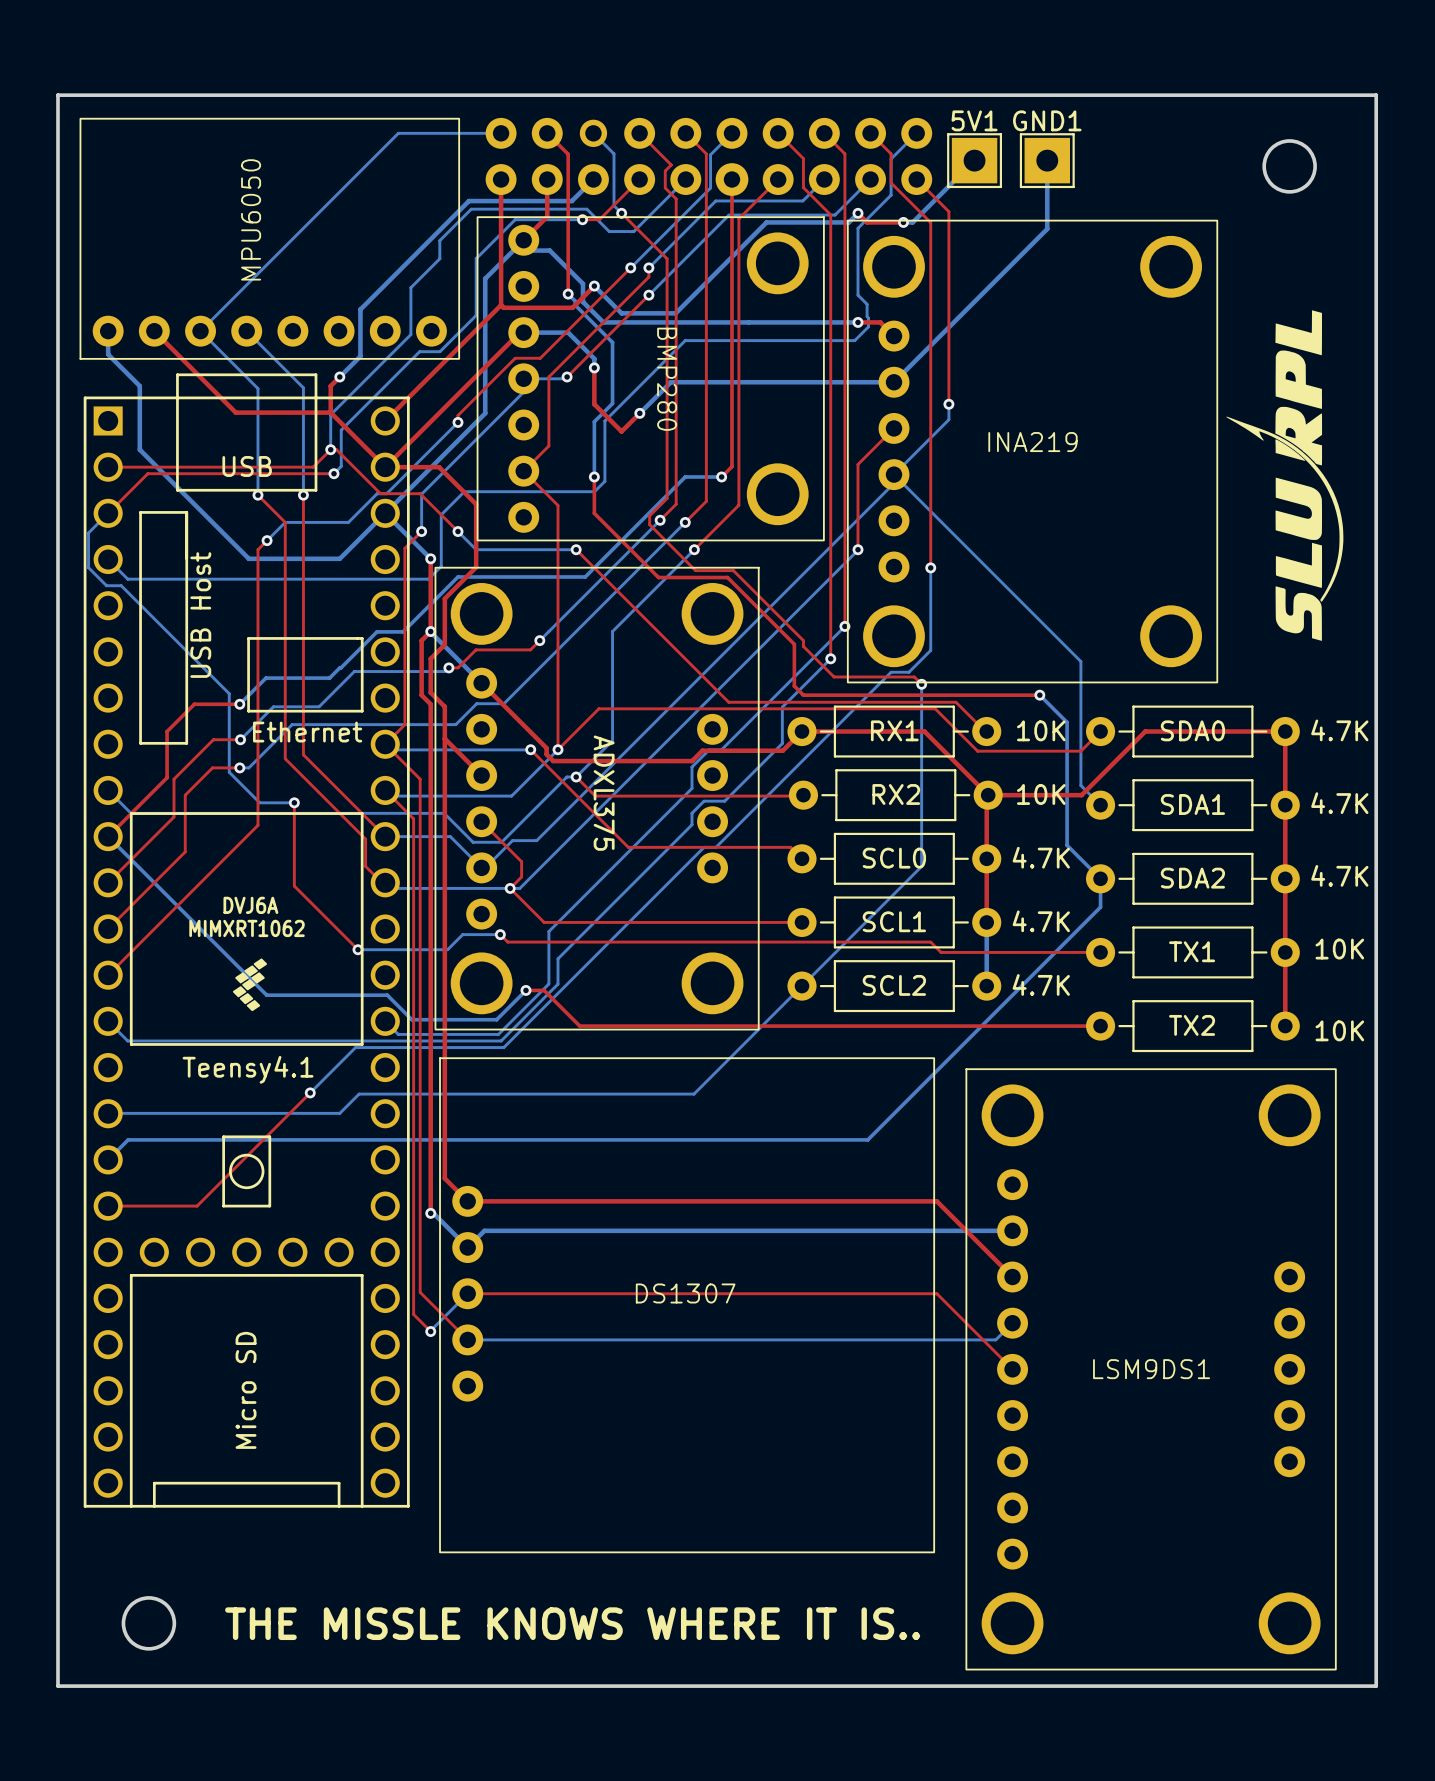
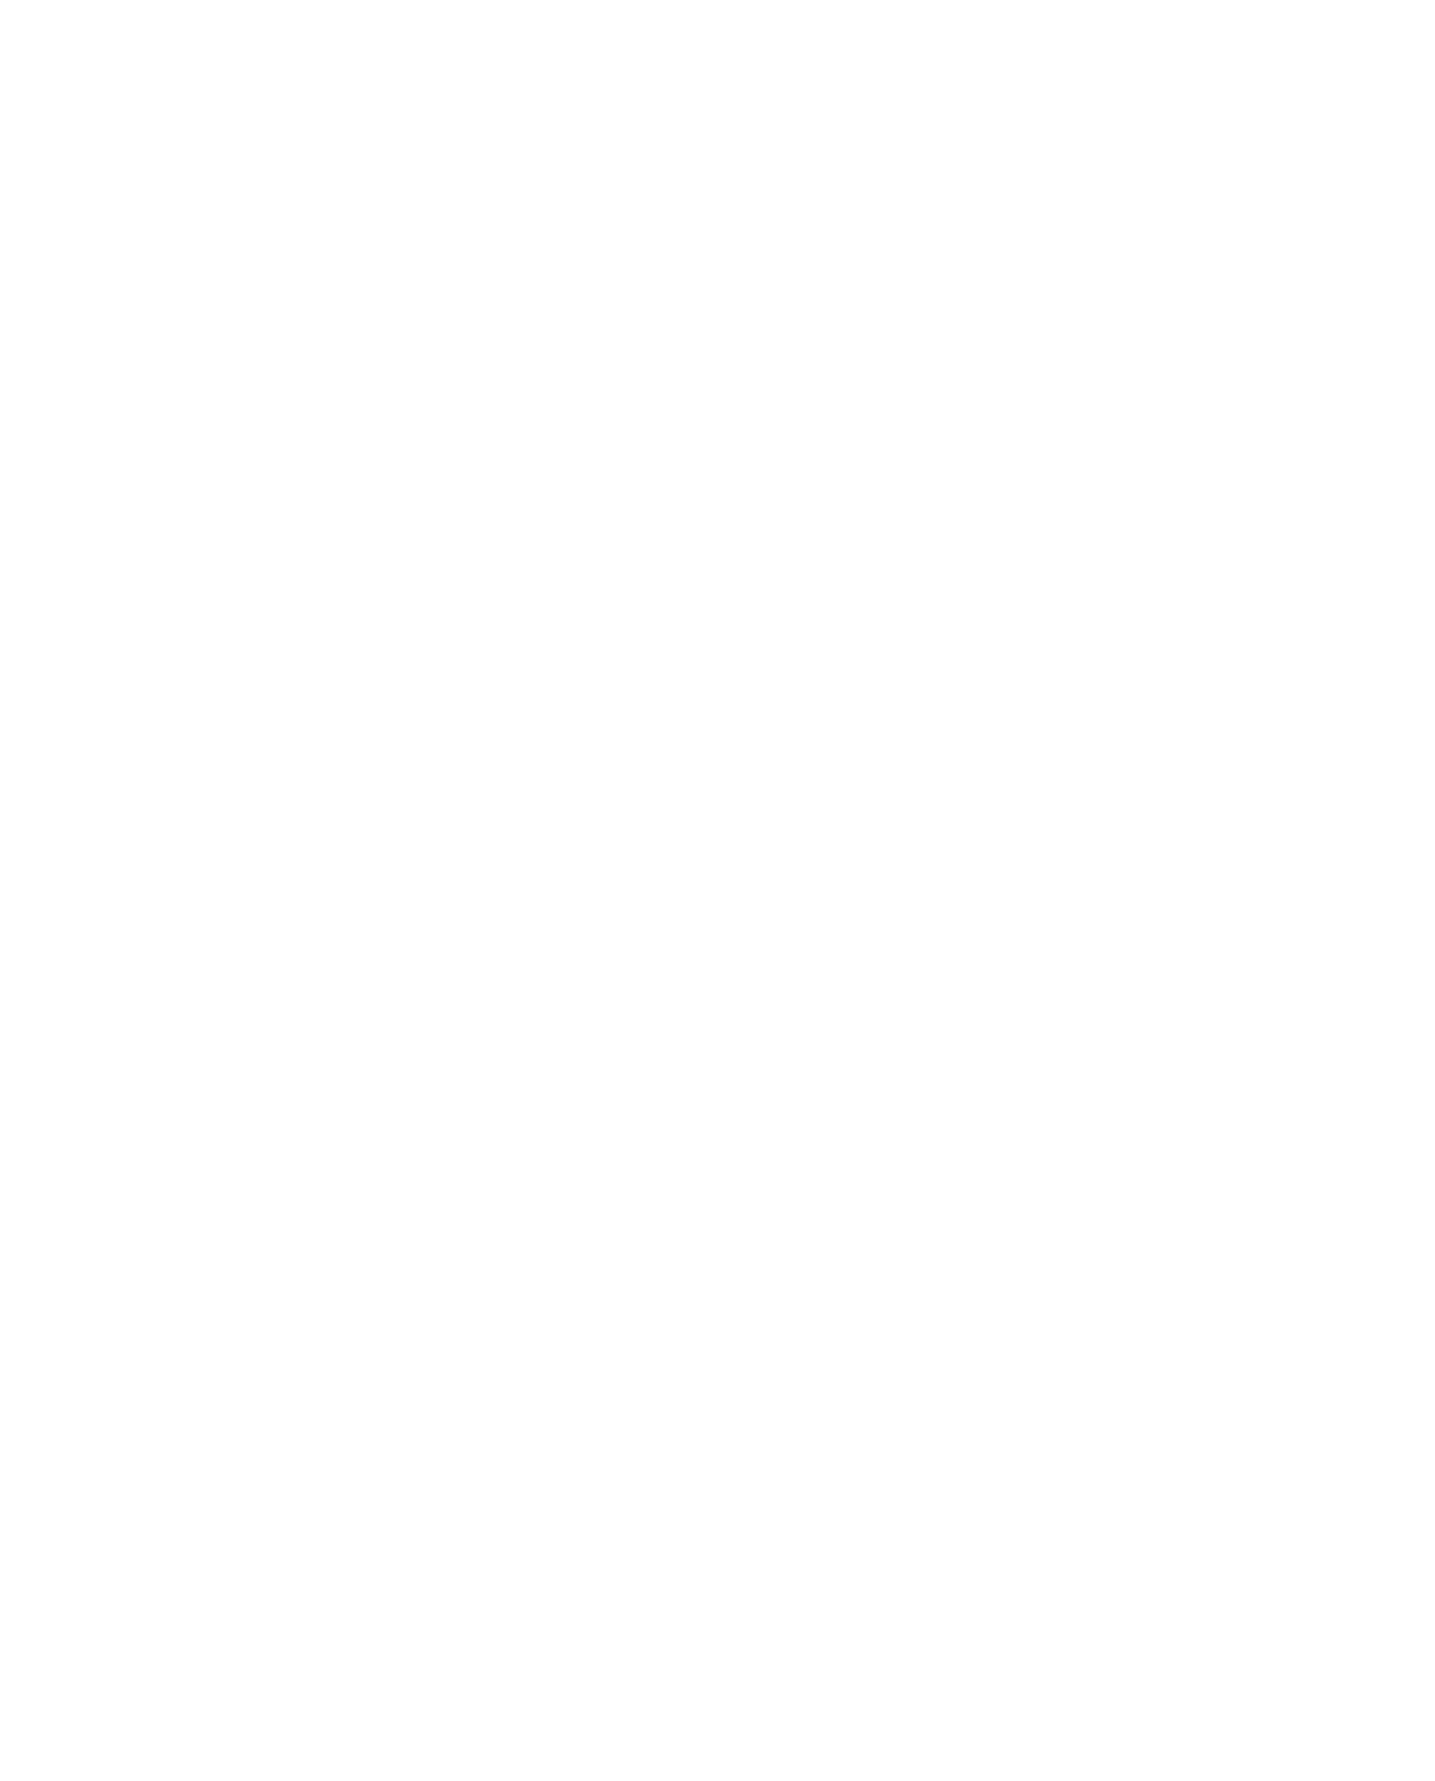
board edge: (57, 95) (1376, 95) (1376, 1686) (57, 1686) (57, 95) -> none
bottom track: (501, 133) (398, 133) (200, 331) (257, 388) (257, 495) -> none
top track: (547, 133) (568, 154) (568, 294) -> none
bottom track: (593, 133) (614, 153) (614, 205) (621, 213) -> none
top track: (639, 133) (671, 165) (665, 171) (665, 188) (676, 198) (676, 504) (660, 520) -> none
top track: (685, 133) (706, 153) (706, 501) (685, 522) -> none
bottom track: (732, 133) (710, 154) (710, 188) (630, 267) -> none
top track: (778, 133) (803, 158) (803, 187) (830, 214) (830, 658) -> none
top track: (824, 133) (844, 153) (844, 626) -> none
top track: (870, 133) (891, 153) (891, 182) (930, 222) (930, 567) -> none
bottom track: (916, 133) (891, 158) (891, 195) (858, 228) (858, 295) (867, 304) (868, 326) (854, 340) (685, 340) (604, 420) (604, 481) (594, 491) (464, 491) (441, 514) (441, 566) (428, 579) (127, 579) (108, 559) -> none
round board edge: [1262, 139, 1317, 194] -> none
part: (708, 156) -> none
bottom track: (974, 160) (912, 222) (903, 222) -> none
5V1: (974, 160) -> none
bottom track: (1047, 160) (1047, 228) (894, 382) (670, 382) (639, 413) -> none
GND1: (1047, 160) -> none
top track: (501, 179) (501, 305) -> none
top track: (547, 179) (547, 216) (523, 240) -> none
bottom track: (593, 179) (571, 201) (468, 201) (360, 309) (360, 356) (339, 376) -> none
top track: (639, 179) (599, 219) (582, 219) -> none
bottom track: (685, 179) (633, 231) (609, 231) (586, 209) (471, 209) (439, 240) (439, 258) (410, 287) (410, 334) (330, 414) (330, 449) -> none
top track: (732, 179) (732, 466) (721, 476) -> none
top track: (778, 179) (738, 218) (738, 505) (694, 549) -> none
bottom track: (824, 179) (802, 200) (715, 200) (648, 267) -> none
bottom track: (870, 179) (835, 215) (729, 215) (648, 295) -> none
top track: (916, 179) (948, 211) (948, 404) -> none
top track: (621, 213) (667, 258) (667, 498) (649, 515) (649, 524) (695, 570) (733, 570) (803, 640) (803, 646) (834, 676) (914, 676) (921, 684) -> none
via: (621, 213) -> none
top track: (858, 213) (867, 222) (903, 222) -> none
bottom track: (858, 213) (848, 222) (766, 222) (675, 313) (621, 313) (594, 286) -> none
via: (858, 213) -> none
bottom track: (582, 219) (515, 219) (476, 258) (476, 315) (439, 351) (419, 351) (341, 430) (341, 466) (333, 473) -> none
via: (582, 219) -> none
via: (903, 222) -> none
MPU6050: (269, 238) -> none
bottom track: (523, 240) (485, 278) (485, 413) (339, 558) (248, 558) (139, 449) (139, 386) (108, 354) (108, 331) -> none
bottom track: (513, 250) (549, 250) (583, 283) (583, 301) (603, 322) (858, 322) -> none
top track: (630, 267) (540, 358) (515, 358) (457, 415) (457, 422) -> none
via: (630, 267) -> none
top track: (648, 267) (648, 276) (548, 376) (548, 445) (523, 471) (558, 505) (558, 749) (598, 708) (935, 708) (977, 751) (1080, 751) (1100, 731) (1091, 722) -> none
via: (648, 267) -> none
top track: (594, 286) (572, 307) (503, 307) (501, 305) -> none
via: (594, 286) -> none
bottom track: (568, 294) (575, 301) (575, 305) (612, 342) (612, 403) (594, 421) (594, 476) -> none
via: (568, 294) -> none
top track: (648, 295) (567, 376) -> none
via: (648, 295) -> none
top track: (501, 305) (385, 420) -> none
drawing: [1226, 310, 1344, 641] -> none
top track: (858, 322) (880, 322) (894, 336) -> none
via: (858, 322) -> none
top track: (154, 331) (235, 412) (330, 412) -> none
bottom track: (246, 331) (303, 387) (303, 495) -> none
top track: (523, 332) (519, 332) (385, 467) -> none
bottom track: (523, 332) (568, 332) (594, 358) (594, 367) -> none
top track: (594, 367) (594, 404) (621, 431) (639, 413) -> none
via: (594, 367) -> none
top track: (339, 376) (330, 386) (330, 412) -> none
via: (339, 376) -> none
bottom track: (567, 376) (565, 378) (523, 378) (523, 392) (421, 494) (421, 531) -> none
via: (567, 376) -> none
BMP280: (650, 378) -> none
bottom track: (948, 404) (948, 419) (894, 474) -> none
via: (948, 404) -> none
top track: (330, 412) (385, 467) -> none
via: (639, 413) -> none
bottom track: (457, 422) (386, 493) (377, 493) (348, 522) (285, 522) (267, 540) -> none
via: (457, 422) -> none
top track: (894, 428) (858, 464) (858, 549) -> none
via: (330, 449) -> none
INA219: (1032, 451) -> none
top track: (108, 467) (313, 467) (330, 449) (336, 449) (380, 493) (420, 493) (457, 531) -> none
top track: (385, 467) (439, 467) (476, 504) (476, 567) (444, 598) (444, 644) (430, 658) (430, 692) (444, 706) (444, 1178) (467, 1201) (936, 1201) (1012, 1277) -> none
top track: (333, 473) (147, 473) (108, 513) -> none
via: (333, 473) -> none
bottom track: (894, 474) (1080, 661) (1080, 785) (1100, 805) -> none
bottom track: (894, 474) (894, 483) (536, 840) (512, 840) (485, 867) (481, 867) (450, 836) (385, 836) -> none
top track: (594, 476) (594, 513) (658, 577) (727, 577) (794, 644) (794, 686) (803, 695) (1039, 695) -> none
via: (594, 476) -> none
bottom track: (721, 476) (685, 476) (585, 576) (457, 576) (403, 631) (376, 631) (329, 678) (265, 678) (239, 704) -> none
via: (721, 476) -> none
top track: (257, 495) (285, 522) (285, 758) (365, 839) (365, 866) (381, 882) (385, 882) -> none
via: (257, 495) -> none
top track: (303, 495) (303, 754) (385, 836) -> none
via: (303, 495) -> none
bottom track: (108, 513) (88, 532) (88, 567) (106, 585) (121, 585) (229, 693) (229, 772) (259, 802) (294, 802) -> none
bottom track: (385, 513) (430, 558) -> none
bottom track: (660, 520) (539, 640) -> none
via: (660, 520) -> none
bottom track: (685, 522) (503, 703) (476, 703) (455, 724) (292, 724) (248, 767) (239, 767) -> none
via: (685, 522) -> none
top track: (421, 531) (404, 548) (404, 724) (385, 744) (420, 779) (420, 1292) (467, 1339) -> none
via: (421, 531) -> none
bottom track: (457, 531) (476, 549) (576, 549) -> none
via: (457, 531) -> none
top track: (267, 540) (257, 549) (257, 825) (108, 975) -> none
via: (267, 540) -> none
top track: (576, 549) (728, 702) (956, 702) (986, 731) -> none
via: (576, 549) -> none
bottom track: (694, 549) (612, 631) (612, 740) (576, 776) (566, 776) (501, 842) (473, 842) (444, 813) (131, 813) (108, 790) -> none
via: (694, 549) -> none
bottom track: (858, 549) (519, 888) (390, 888) (385, 882) -> none
via: (858, 549) -> none
top track: (430, 558) (430, 631) (421, 640) (421, 695) (430, 704) (430, 1213) -> none
via: (430, 558) -> none
bottom track: (930, 567) (930, 650) (908, 672) (891, 672) (715, 847) (704, 847) (503, 1047) (355, 1047) (310, 1092) -> none
via: (930, 567) -> none
bottom track: (844, 626) (721, 749) (709, 749) (692, 767) (692, 788) (548, 931) (548, 983) (498, 1034) (398, 1034) (385, 1021) -> none
via: (844, 626) -> none
bottom track: (430, 631) (481, 683) -> none
via: (430, 631) -> none
top track: (539, 640) (530, 649) (475, 649) (457, 667) (448, 667) -> none
via: (539, 640) -> none
bottom track: (830, 658) (782, 707) (782, 743) (724, 801) (704, 801) (692, 813) (692, 824) (558, 958) (558, 984) (501, 1041) (127, 1041) (108, 1021) -> none
via: (830, 658) -> none
bottom track: (448, 667) (445, 671) (354, 671) (319, 706) (273, 706) (240, 739) -> none
via: (448, 667) -> none
top track: (481, 683) (546, 748) (546, 754) (553, 761) (692, 761) (702, 750) (782, 750) (802, 731) (924, 731) (988, 795) -> none
bottom track: (921, 684) (921, 866) (694, 1094) (359, 1094) (339, 1113) (108, 1113) -> none
via: (921, 684) -> none
bottom track: (1039, 695) (1067, 722) (1067, 845) (1100, 878) (1100, 907) (867, 1139) (128, 1139) (108, 1159) -> none
via: (1039, 695) -> none
top track: (239, 704) (194, 704) (167, 731) (167, 777) (108, 836) -> none
via: (239, 704) -> none
RX1: 10K (894, 731) -> none
SDA0: 4.7K (1192, 731) -> none
top track: (444, 738) (481, 775) -> none
top track: (240, 739) (213, 739) (173, 779) (173, 816) (108, 882) -> none
via: (240, 739) -> none
bottom track: (385, 744) (390, 749) (530, 749) -> none
top track: (530, 749) (628, 847) (790, 847) (802, 858) -> none
via: (530, 749) -> none
bottom track: (558, 749) (511, 796) (390, 796) (385, 790) -> none
via: (558, 749) -> none
top track: (239, 767) (212, 767) (185, 795) (185, 851) (108, 928) (108, 926) -> none
via: (239, 767) -> none
top track: (576, 776) (595, 796) (803, 795) -> none
via: (576, 776) -> none
top track: (385, 790) (413, 818) (413, 1314) (430, 1331) -> none
RX2: 10K (895, 795) -> none
top track: (988, 795) (1081, 795) (1145, 731) (1285, 731) (1285, 1026) -> none
top track: (988, 795) (986, 922) -> none
part: ADXL375 (597, 798) -> none
top track: (294, 802) (294, 886) (357, 949) -> none
via: (294, 802) -> none
SDA1: 4.7K (1192, 805) -> none
top track: (481, 821) (521, 861) (521, 876) (510, 888) (544, 922) (802, 922) -> none
bottom track: (108, 836) (266, 995) (387, 995) (411, 1019) (496, 1019) (525, 990) -> none
SCL0: 4.7K (894, 858) -> none
SDA2: 4.7K (1192, 878) -> none
via: (510, 888) -> none
SCL1: 4.7K (894, 922) -> none
bottom track: (986, 922) (986, 986) -> none
top track: (500, 934) (507, 942) (930, 942) (941, 952) (1100, 952) -> none
bottom track: (500, 934) (462, 934) (447, 949) (357, 949) -> none
via: (500, 934) -> none
part: Teensy4.1 (246, 940) -> none
via: (357, 949) -> none
TX1: 10K (1192, 952) -> none
SCL2: 4.7K (894, 986) -> none
top track: (525, 990) (544, 990) (579, 1026) (1100, 1026) -> none
via: (525, 990) -> none
TX2: 10K (1192, 1026) -> none
top track: (312, 1090) (197, 1206) (108, 1206) -> none
via: (310, 1092) -> none
bottom track: (430, 1213) (433, 1213) (467, 1247) (484, 1230) (1012, 1230) -> none
via: (430, 1213) -> none
top track: (467, 1293) (936, 1293) (1012, 1369) -> none
bottom track: (467, 1293) (430, 1331) -> none
DS1307: (687, 1305) -> none
bottom track: (1012, 1323) (995, 1339) (467, 1339) -> none
via: (430, 1331) -> none
LSM9DS1: (1151, 1369) -> none
round board edge: [121, 1596, 177, 1651] -> none
text: THE MISSLE KNOWS WHERE IT IS.. (572, 1623) -> none

